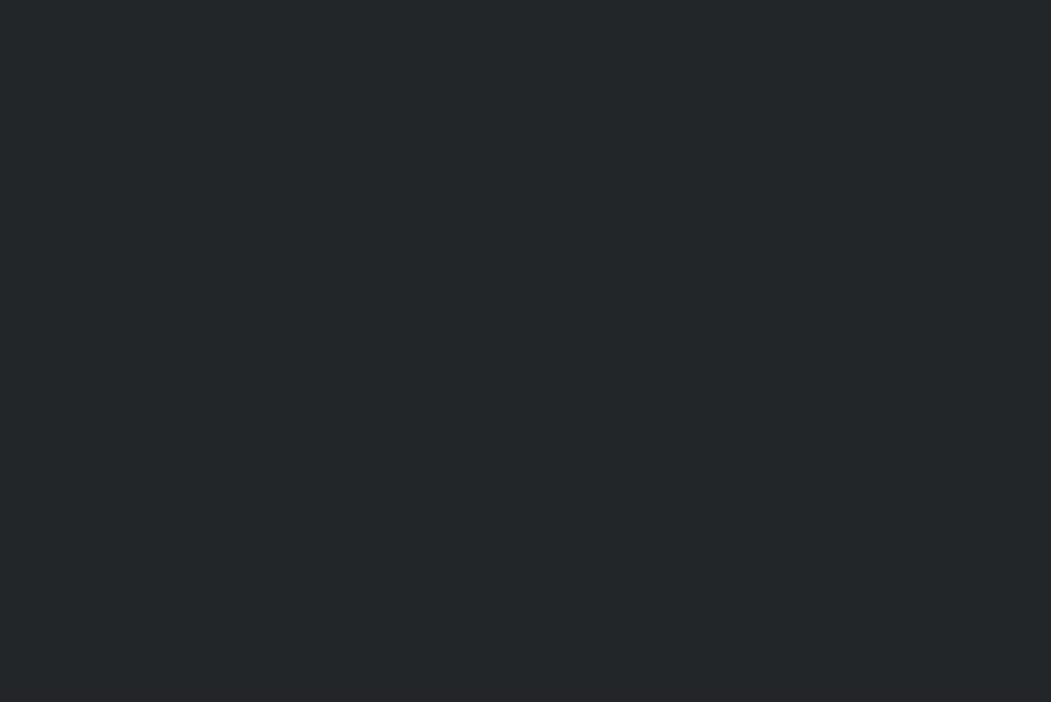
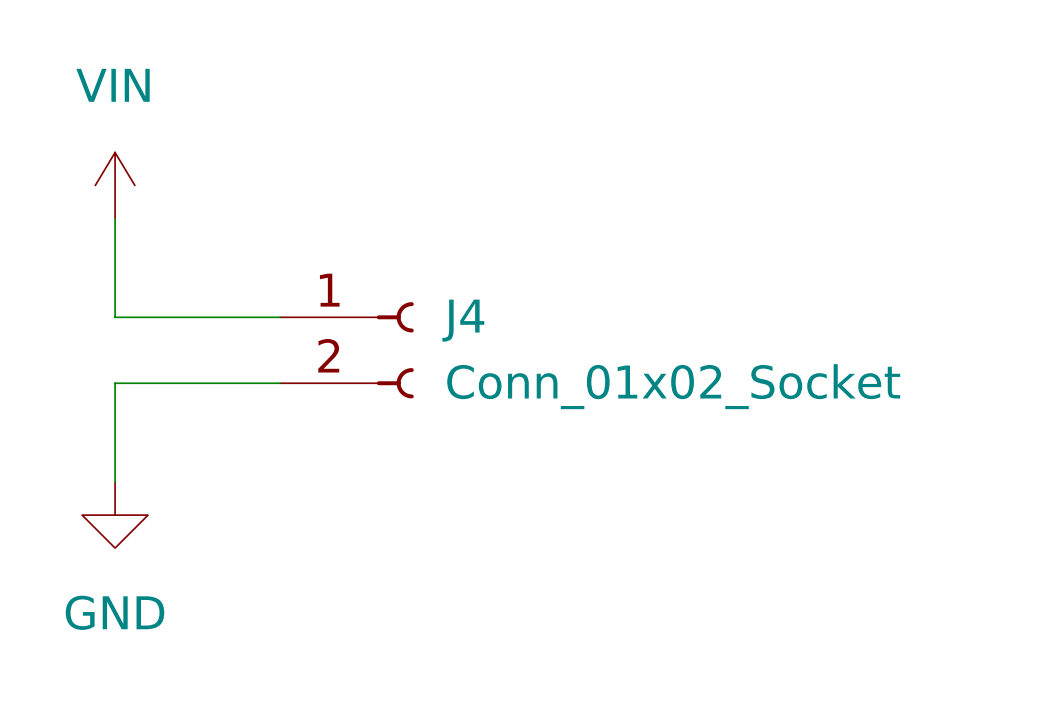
power symbol: none -> VIN (115, 185)
wire: none -> (115, 218) (115, 317) (279, 317)
J4: none -> Conn_01x02_Socket (346, 350)
wire: none -> (279, 383) (115, 383) (115, 482)
power symbol: none -> GND (115, 515)

